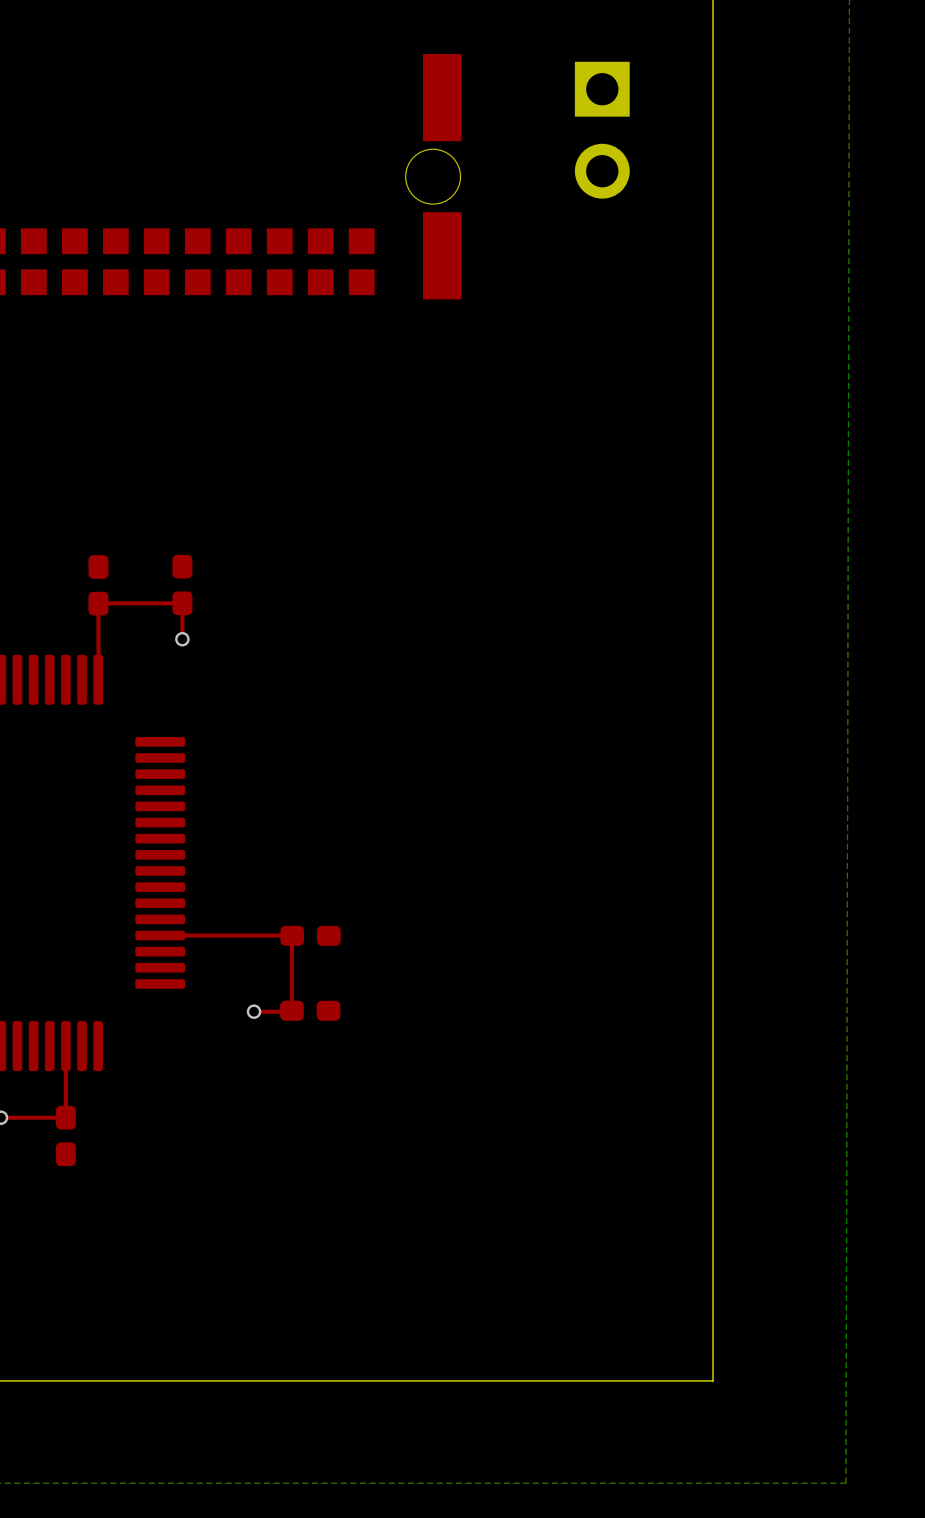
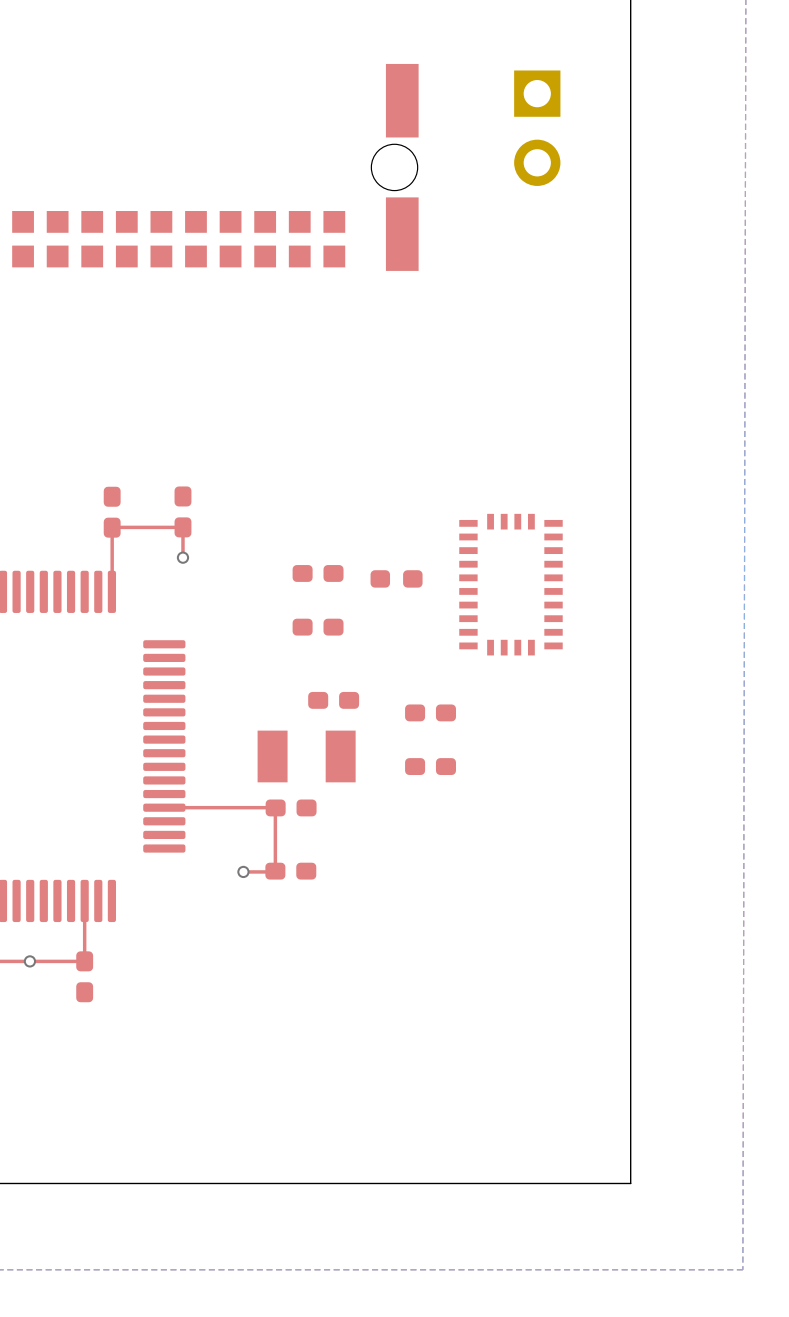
part: none -> (318, 573)
part: none -> (396, 578)
part: none -> (510, 584)
part: none -> (318, 627)
part: none -> (333, 700)
part: none -> (430, 712)
part: none -> (306, 756)
part: none -> (430, 766)

